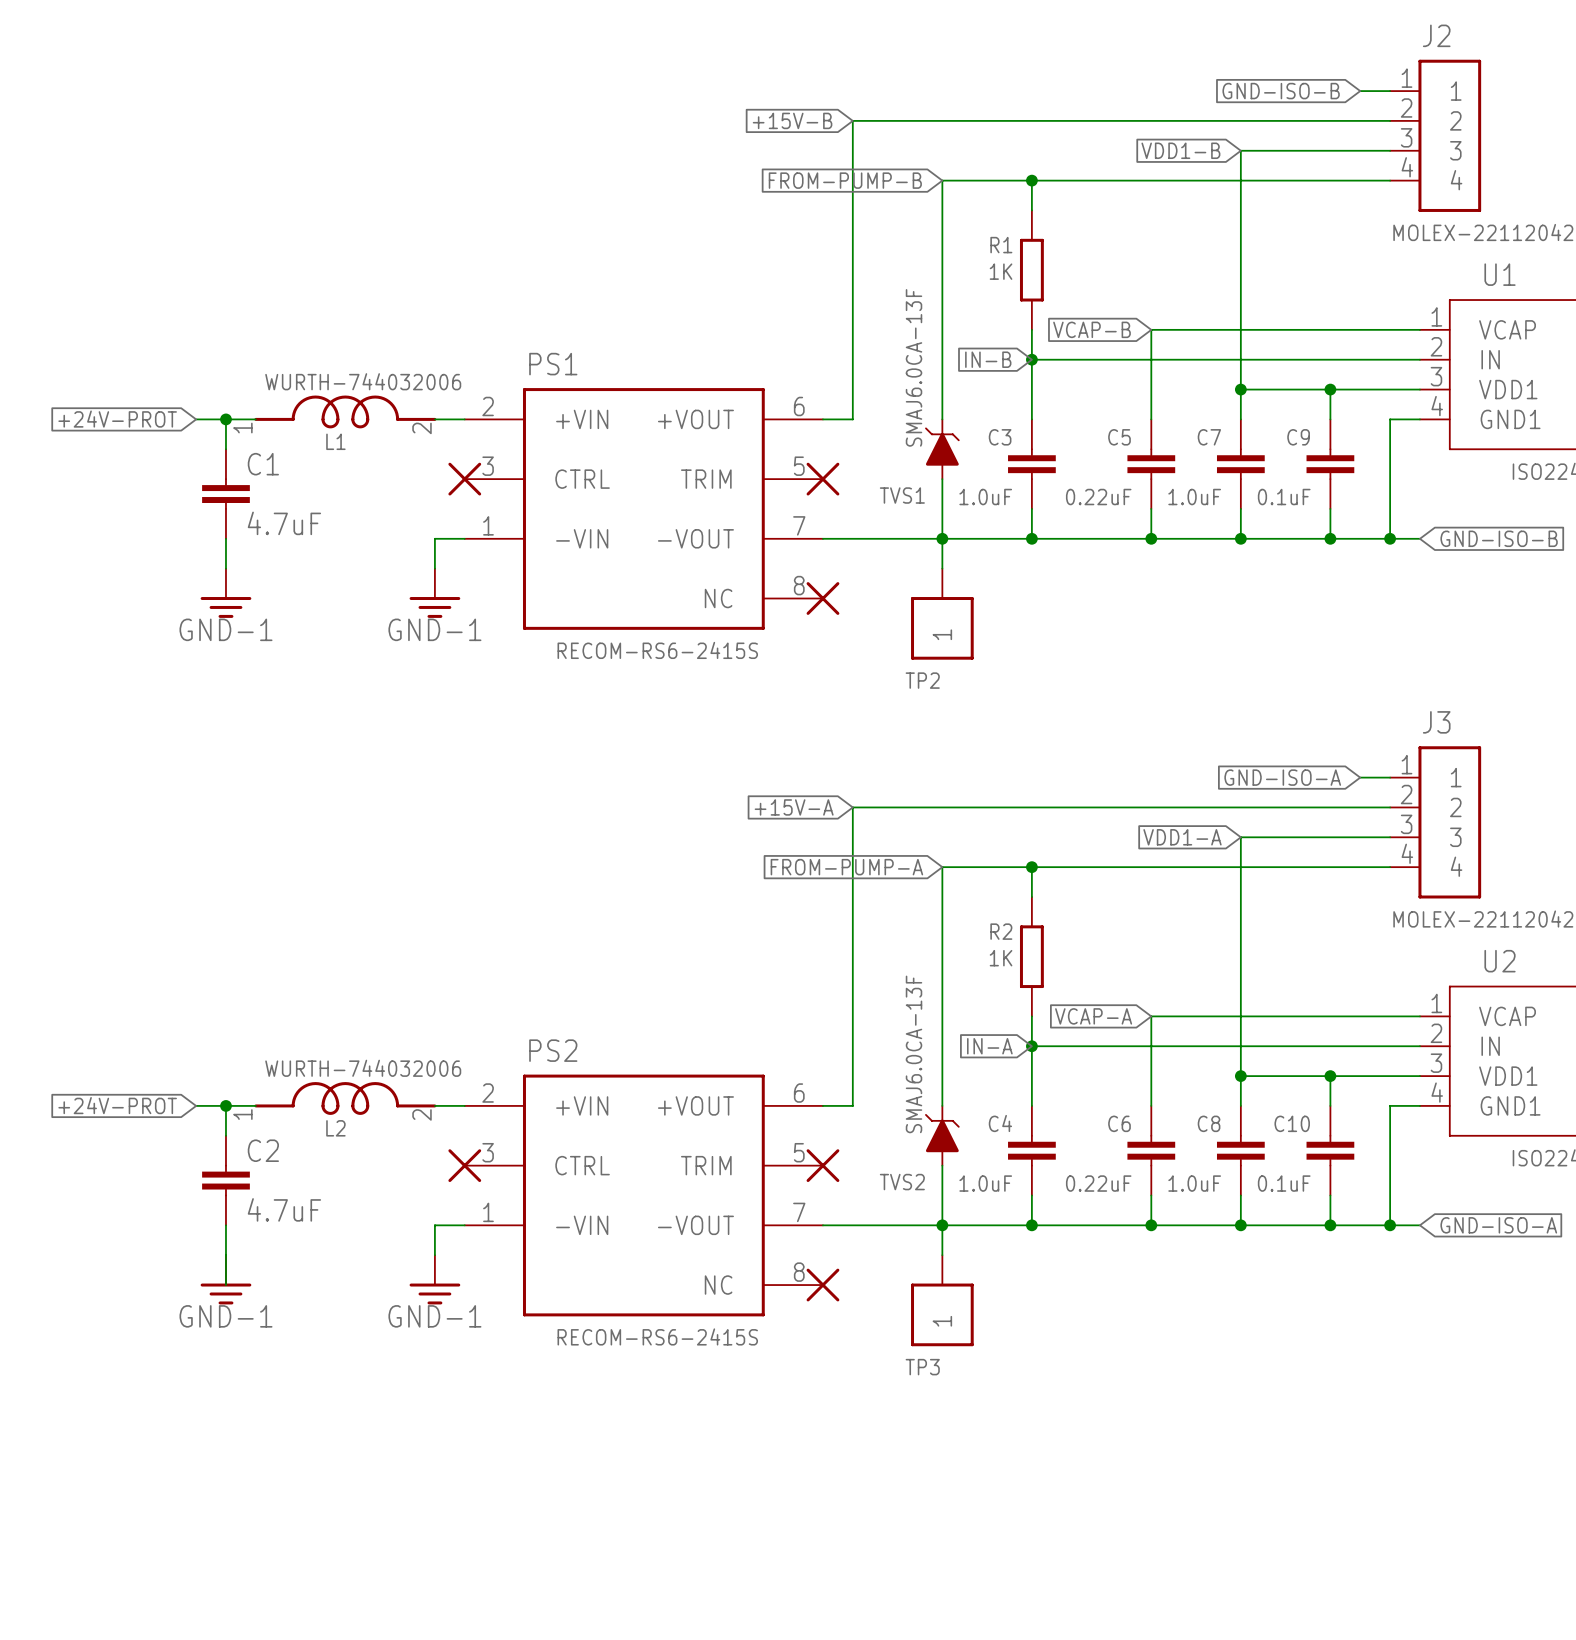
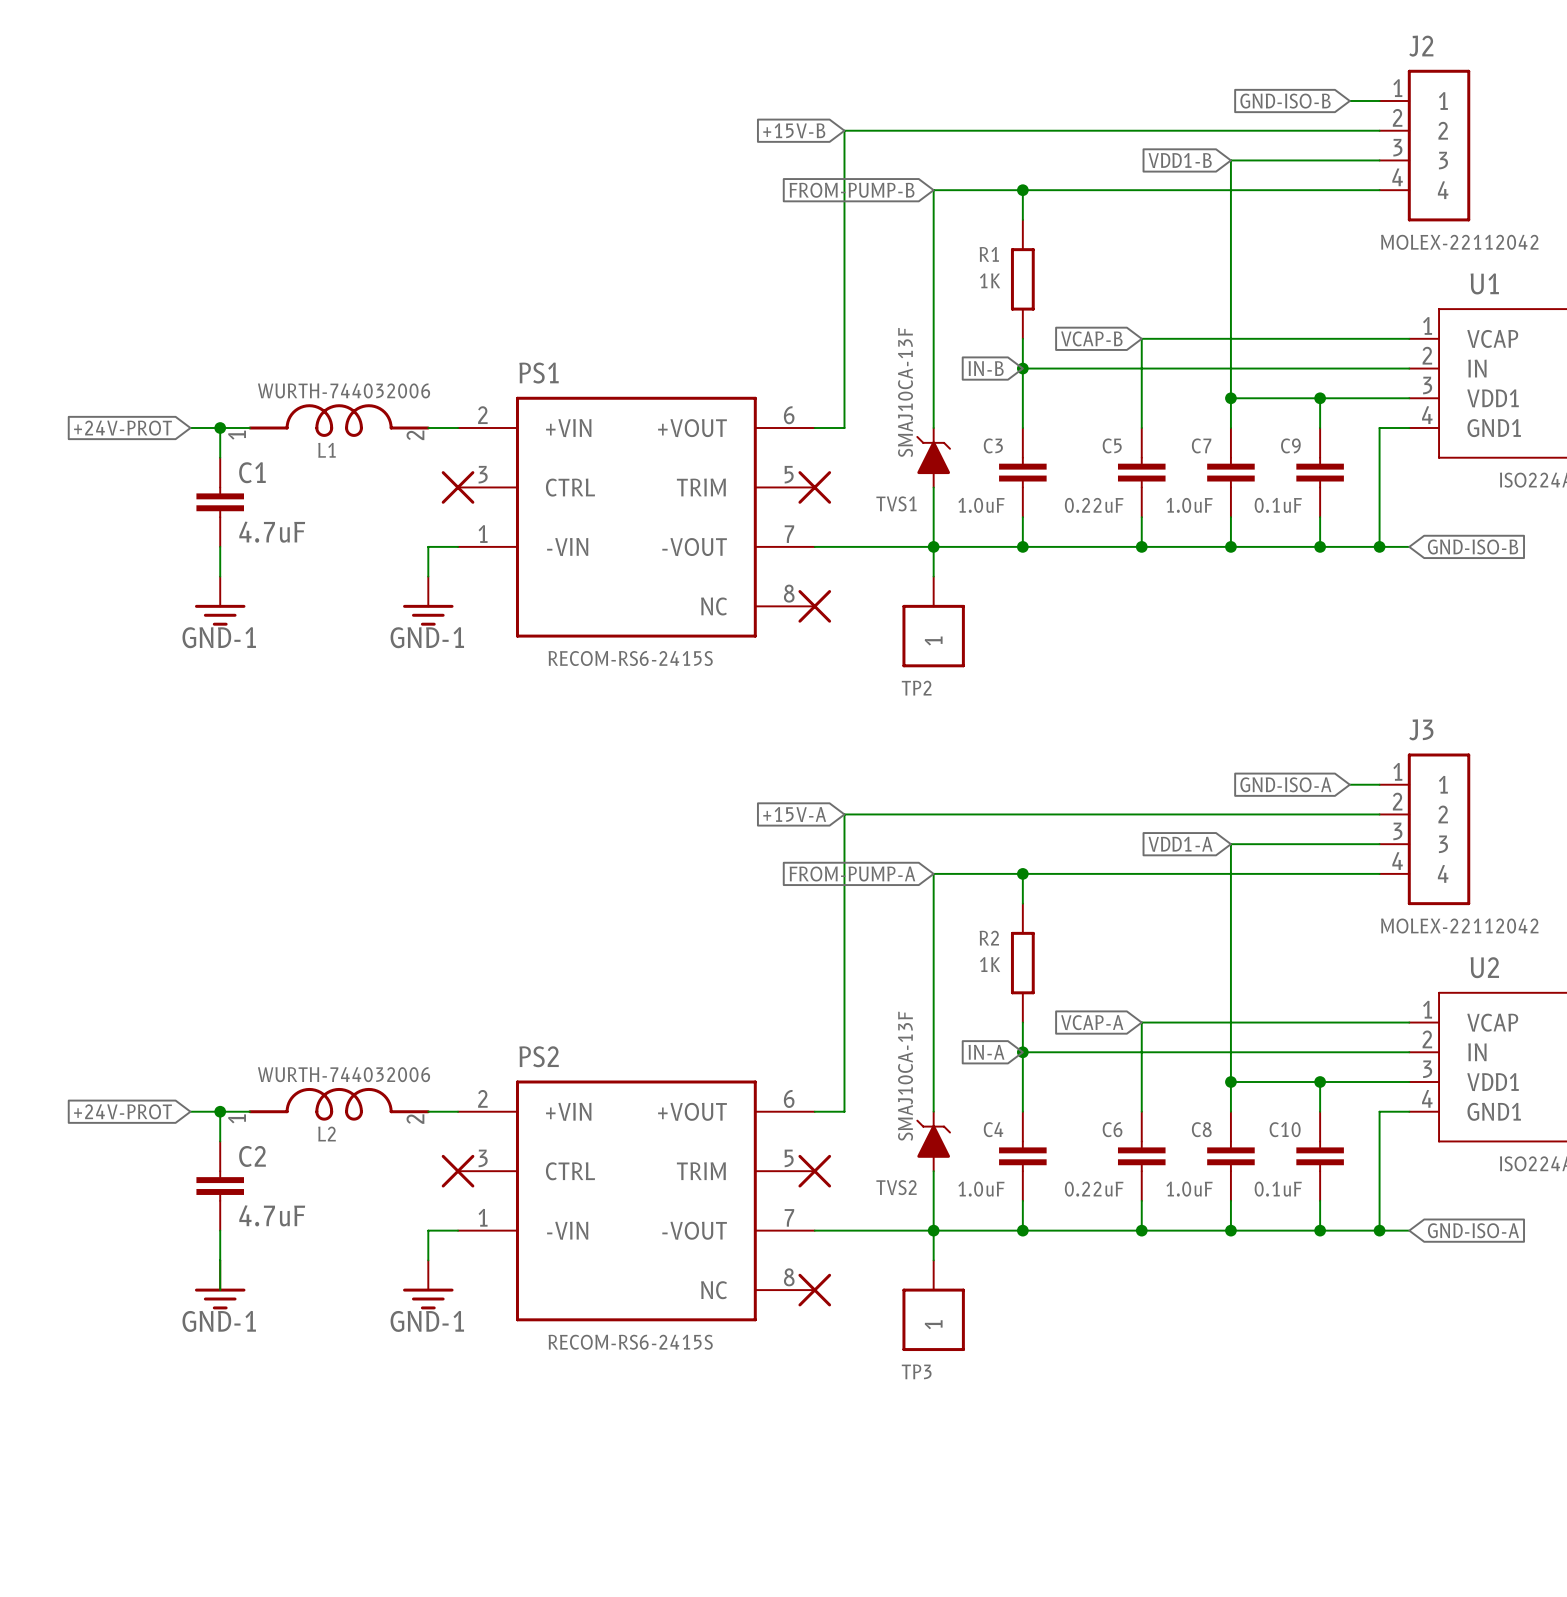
TVS1 value: SMAJ6.0CA-13F (914, 367) -> SMAJ10CA-13F (905, 392)
TVS2 value: SMAJ6.0CA-13F (914, 1054) -> SMAJ10CA-13F (905, 1076)

